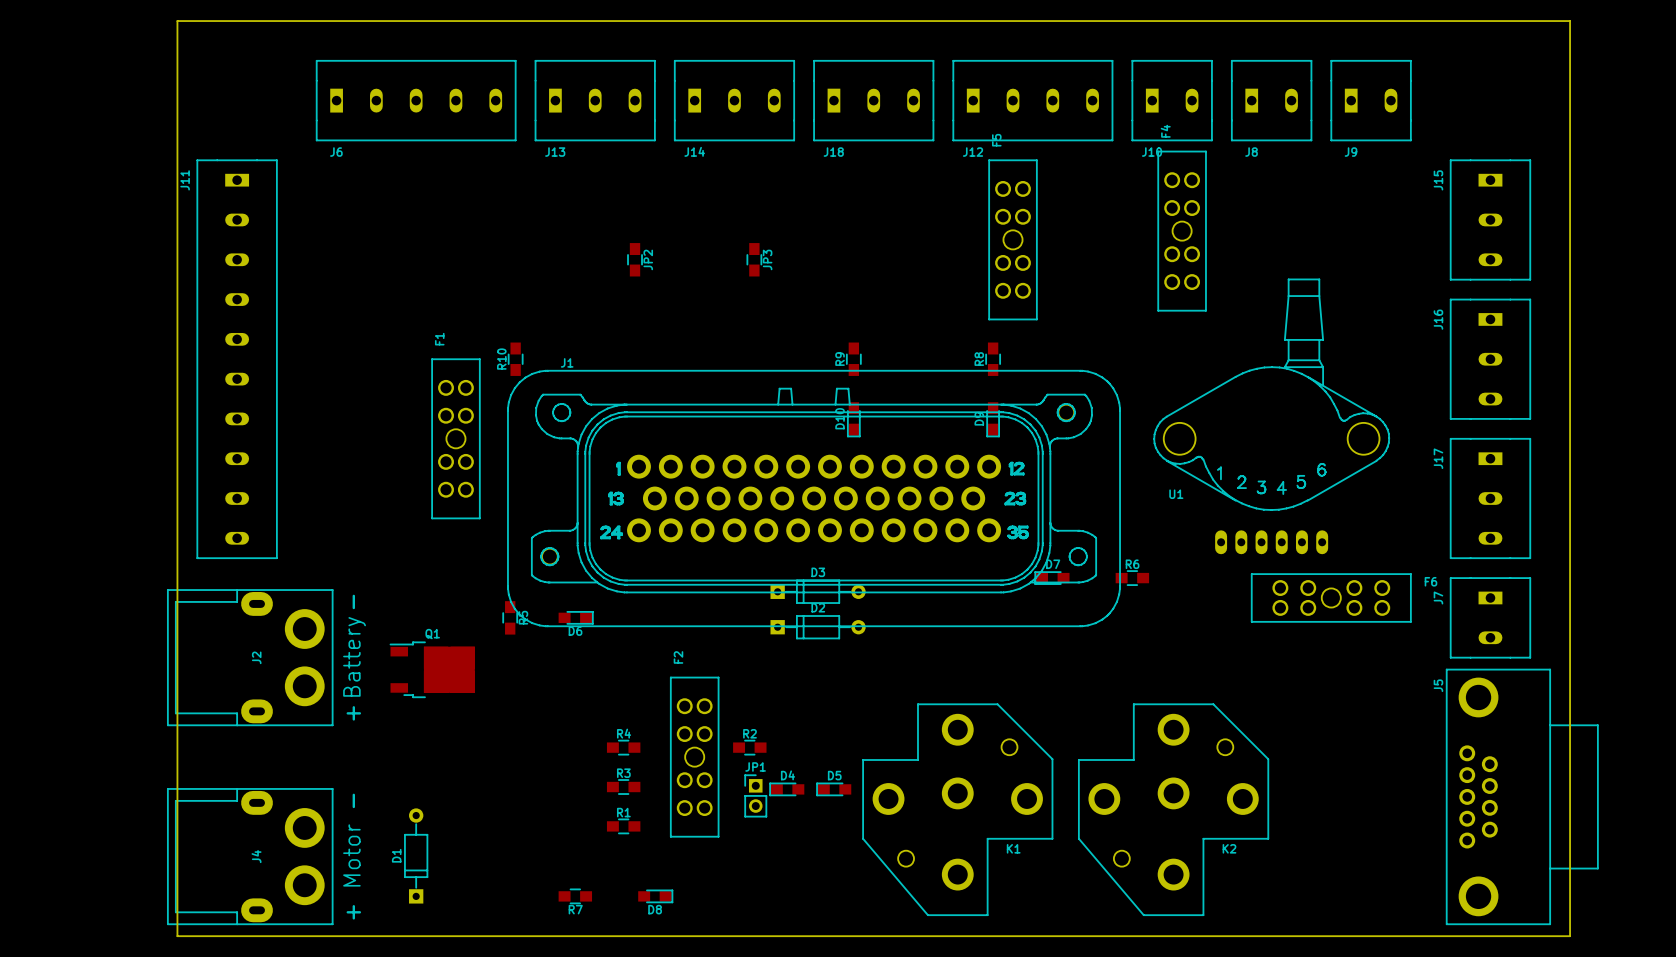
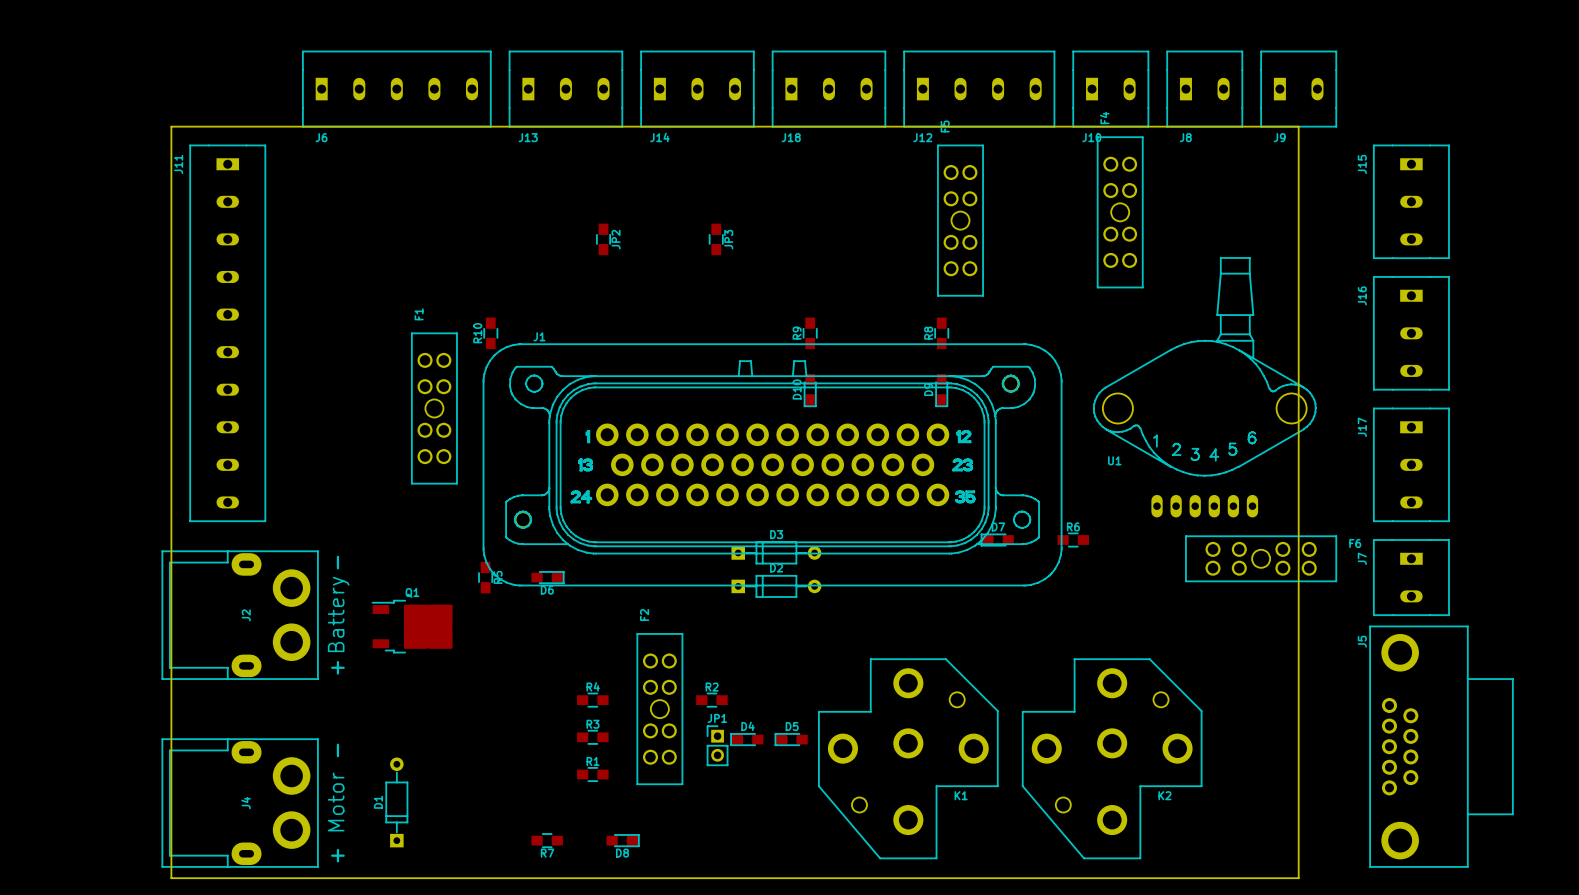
board edge: (177, 140) (177, 21) (1570, 21) (1570, 936) (1371, 936) -> (171, 126) (1298, 126) (1298, 878)

